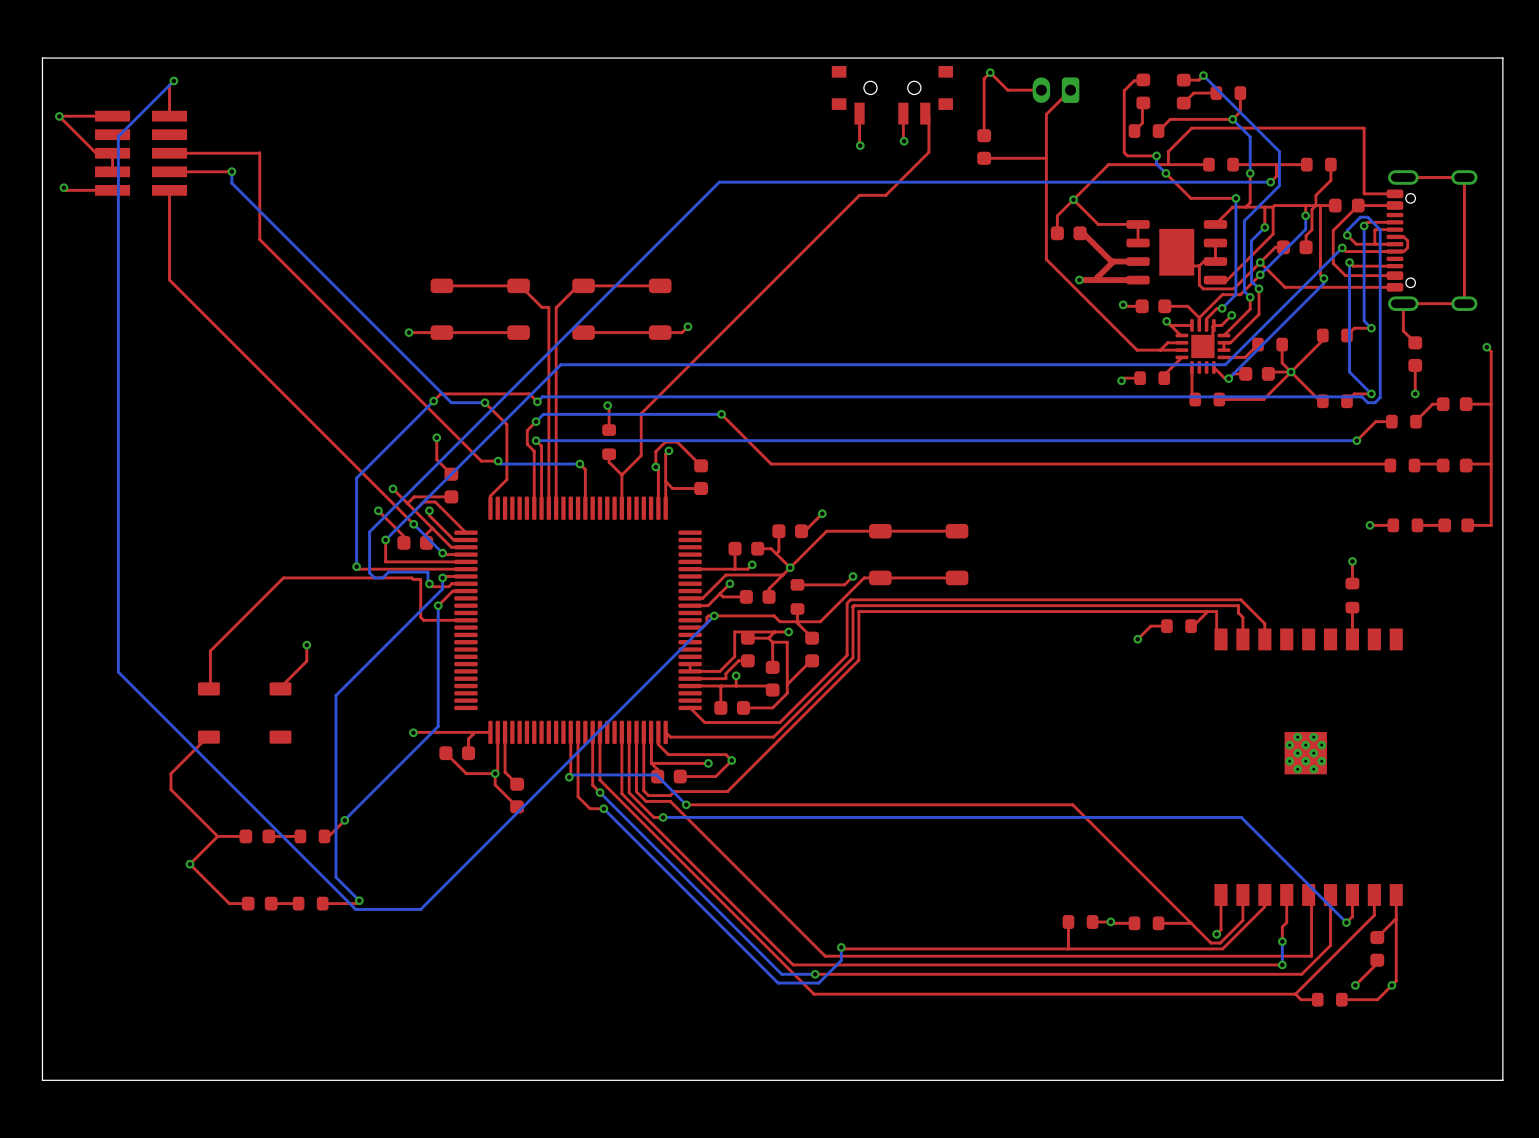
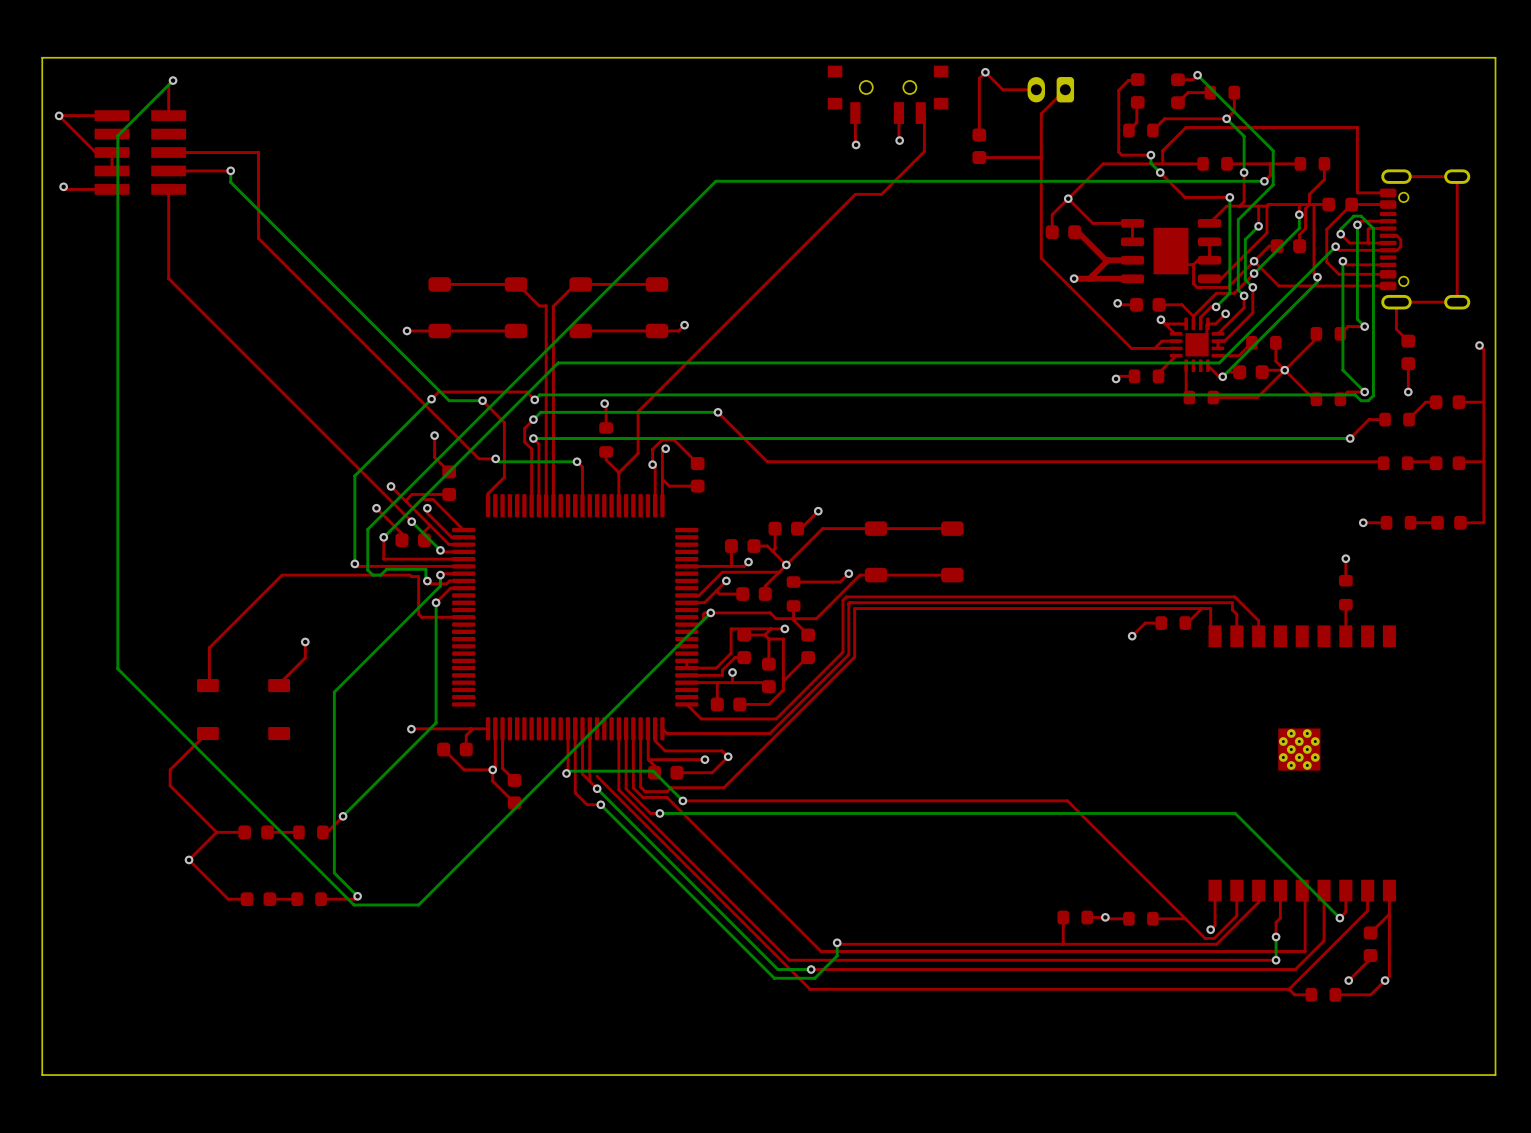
top track: none -> (582, 728) (582, 774) (589, 781)
top track: (599, 732) (599, 780) -> none

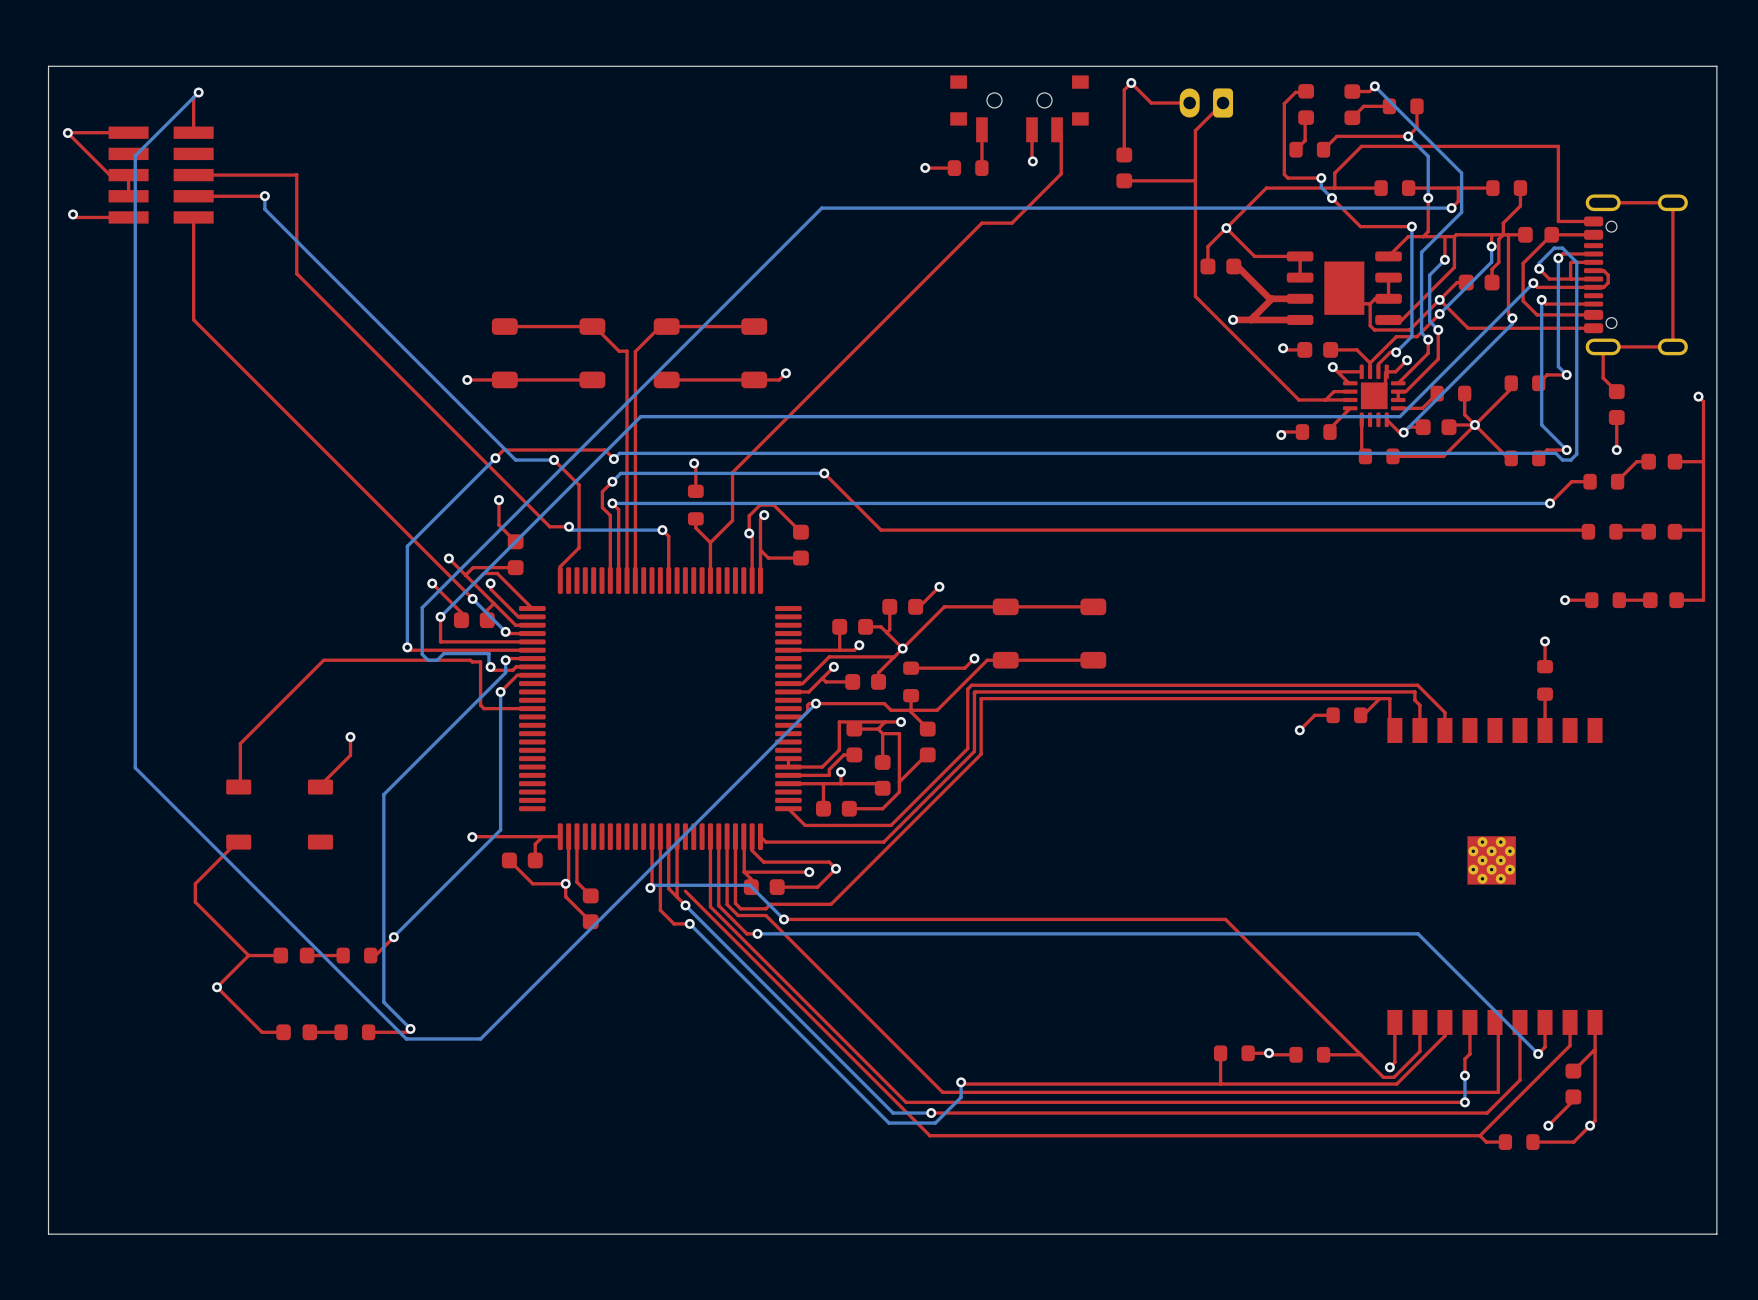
via position: (856, 144) -> (925, 167)
top track: none -> (954, 168) (925, 168)
part: none -> (968, 168)

